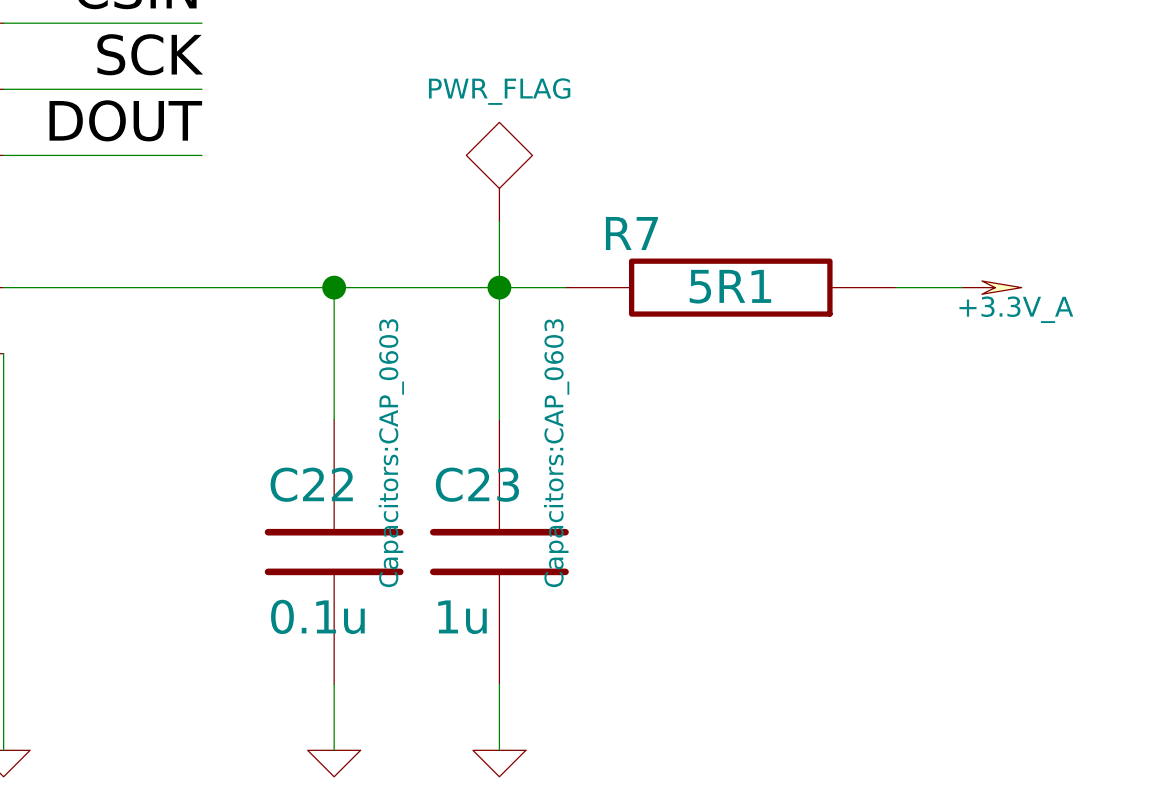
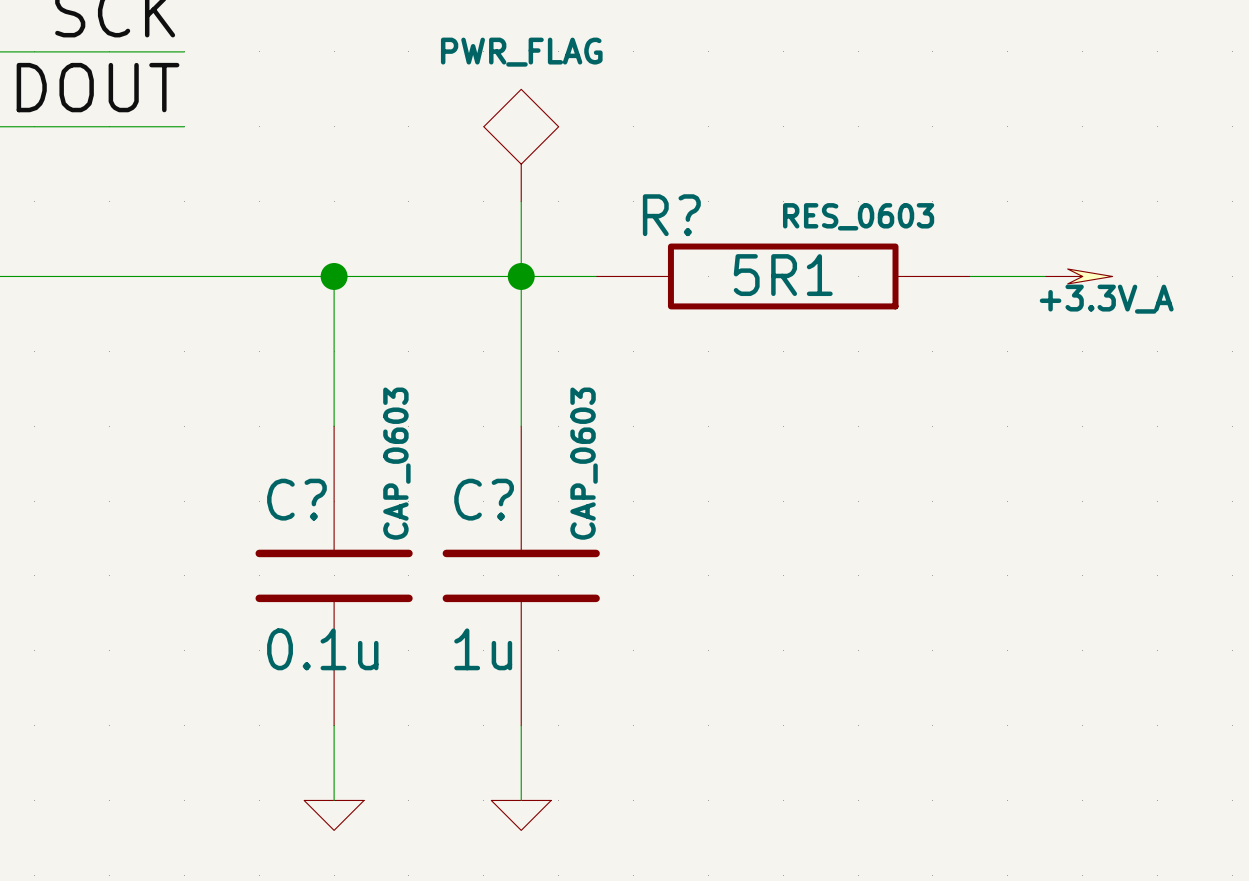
R7 name: R7 (631, 233) -> R? (671, 215)
R7 text: none -> RES_0603 (858, 216)
C22 text: Capacitors:CAP_0603 (391, 453) -> CAP_0603 (396, 463)
C23 text: Capacitors:CAP_0603 (556, 453) -> CAP_0603 (584, 463)
C22 name: C22 (311, 484) -> C? (296, 499)
C23 name: C23 (477, 484) -> C? (484, 499)

